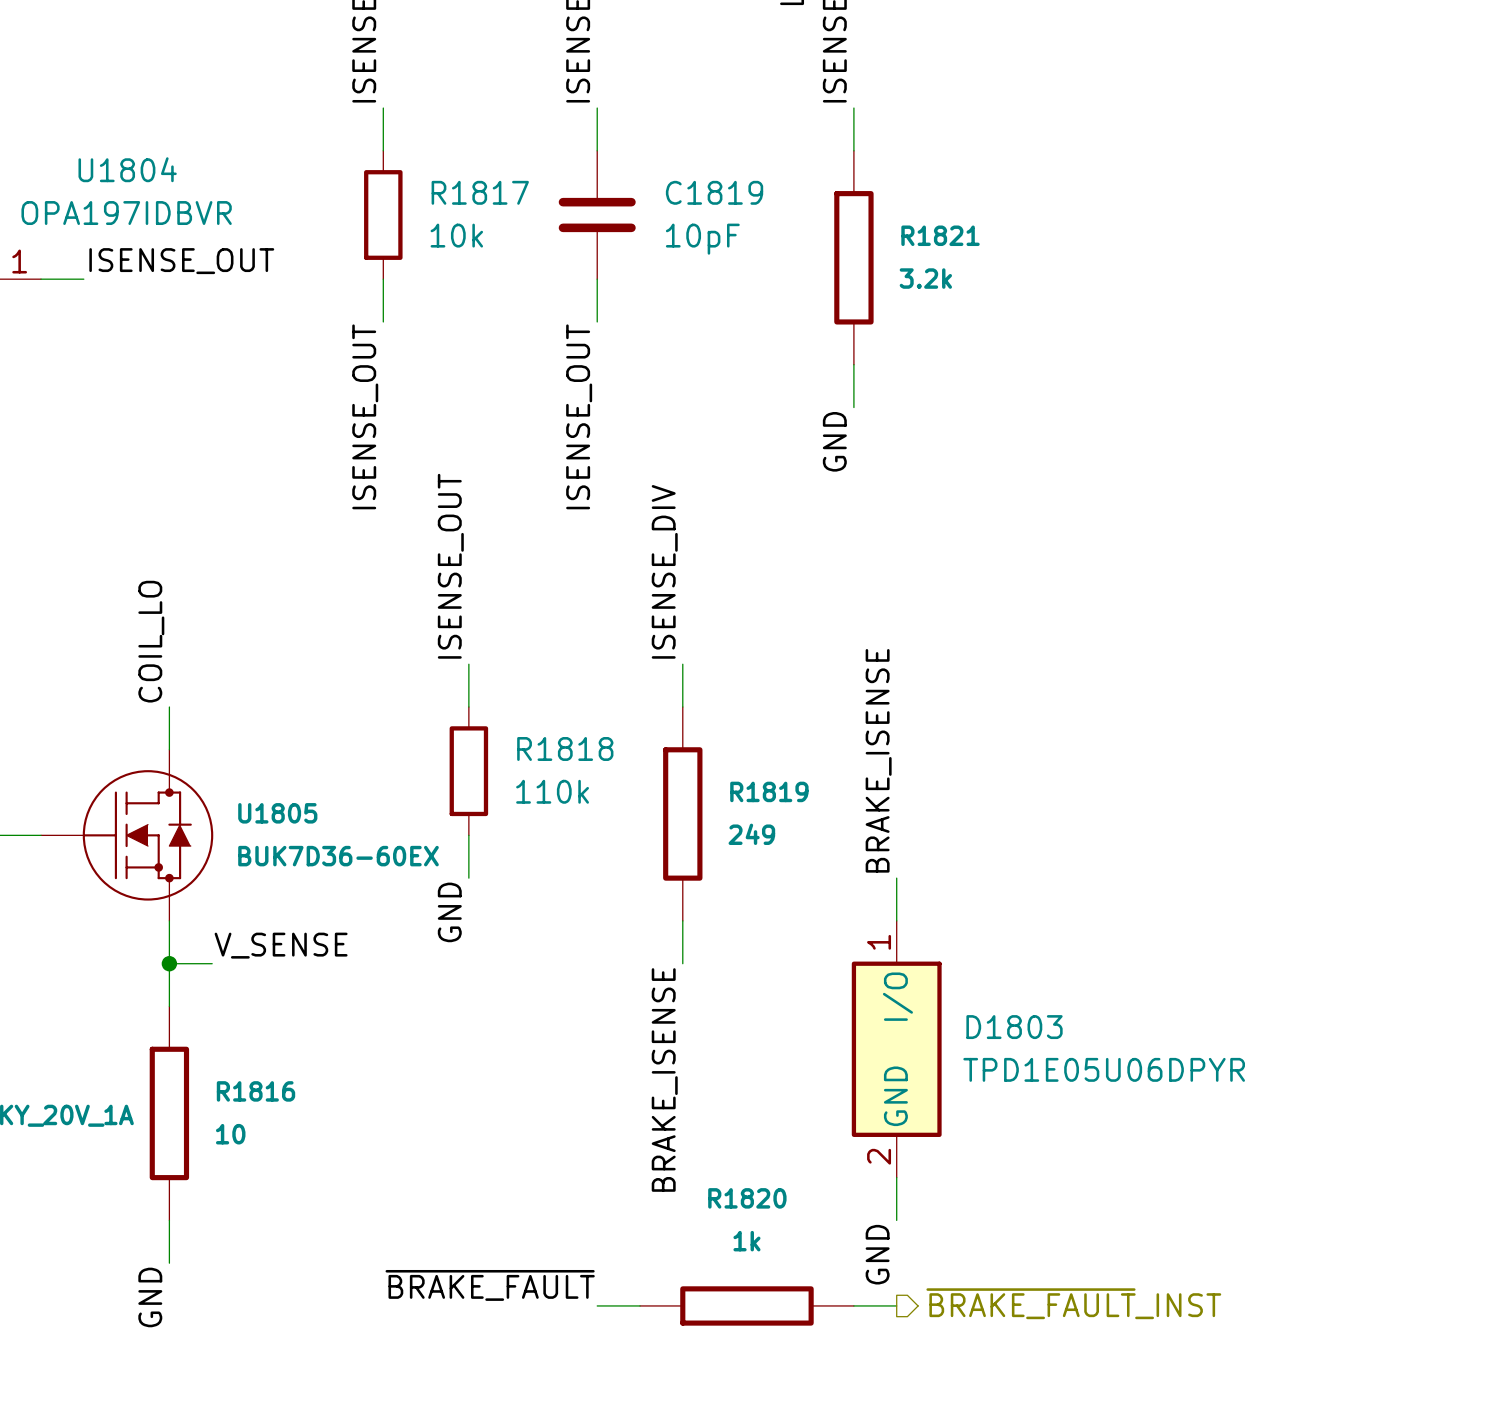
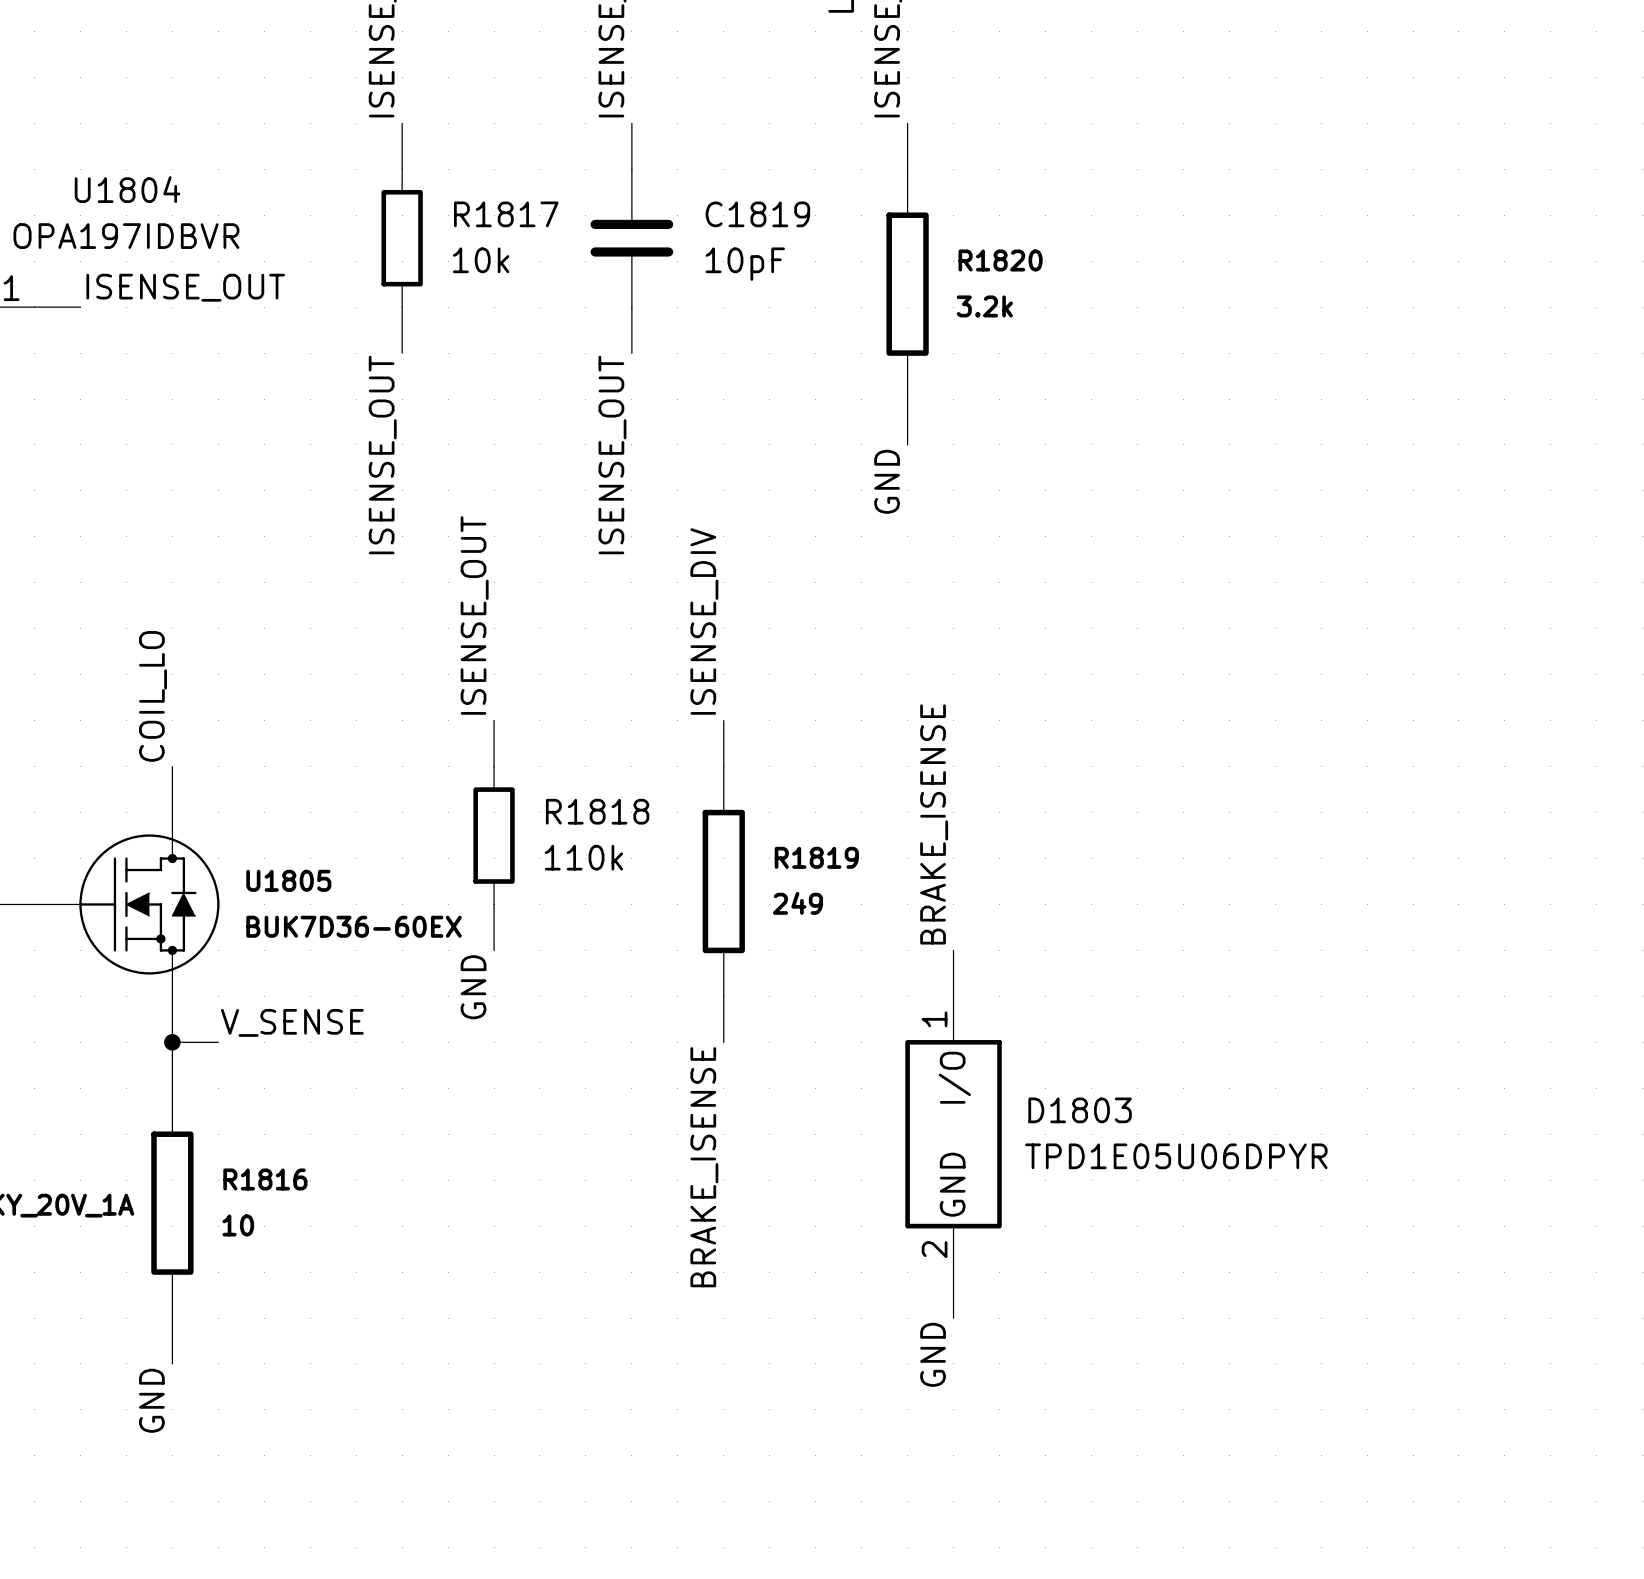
R1821 name: R1821 (940, 235) -> R1820 (1000, 260)
label: ~{BRAKE_FAULT} (490, 1285) -> none
hierarchical label: ~{BRAKE_FAULT}_INST (1073, 1303) -> none
wire: (597, 1305) (640, 1305) -> none
R1820: 1k (746, 1305) -> none
wire: (853, 1305) (896, 1305) -> none

